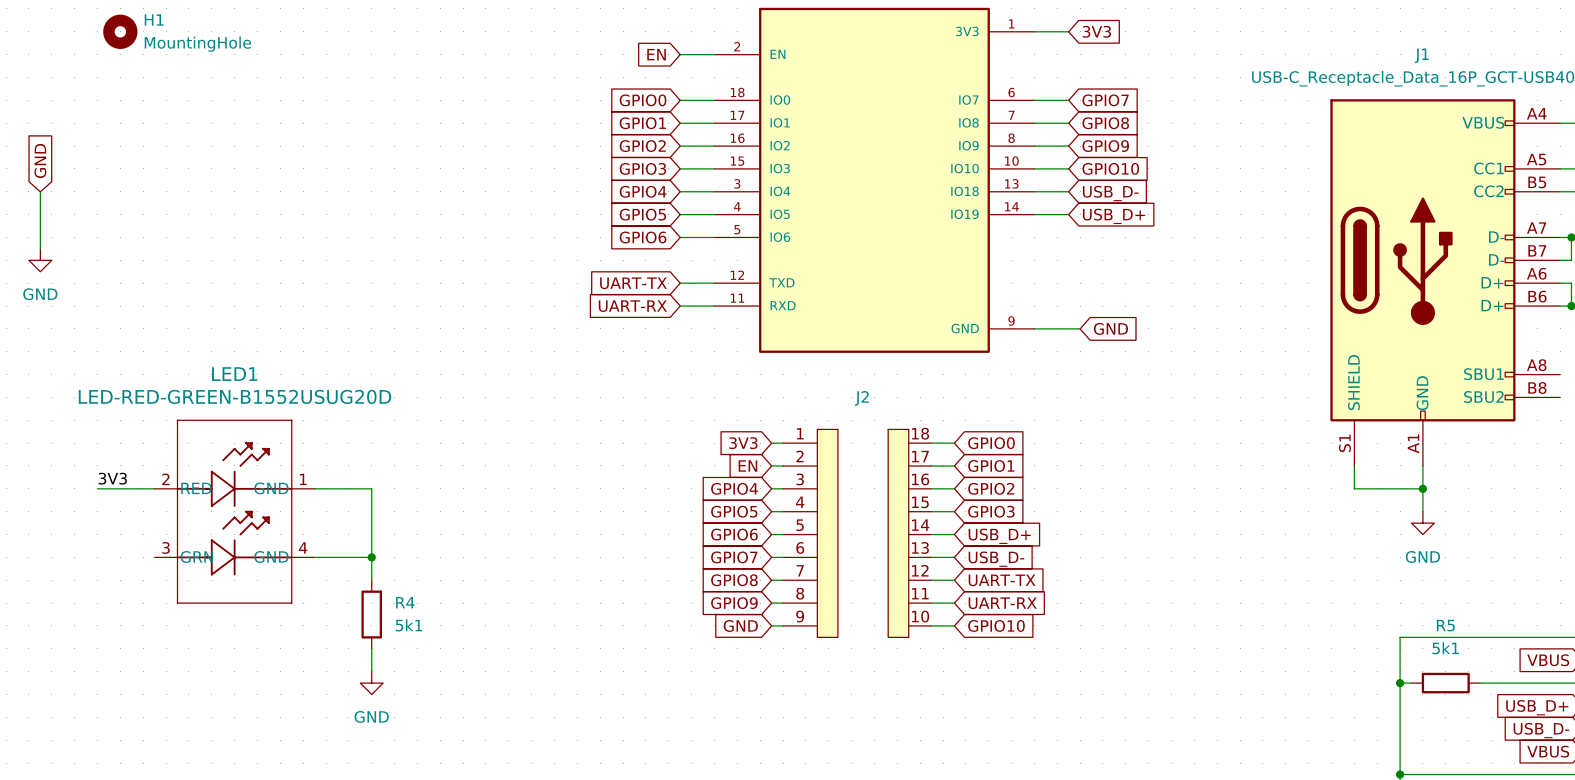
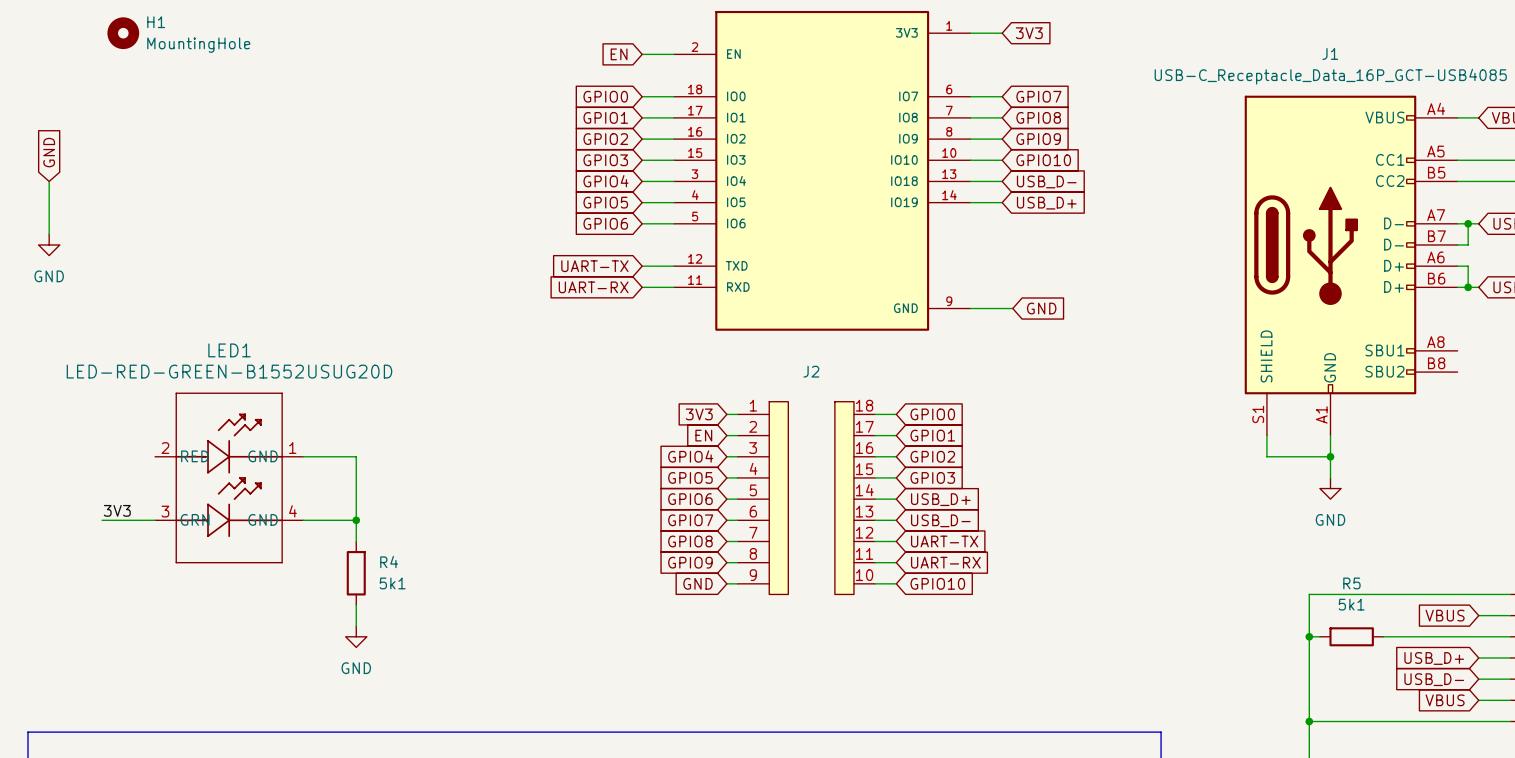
label position: 3V3 (112, 478) -> 3V3 (117, 510)
wire: (97, 488) (154, 488) -> (102, 520) (155, 520)

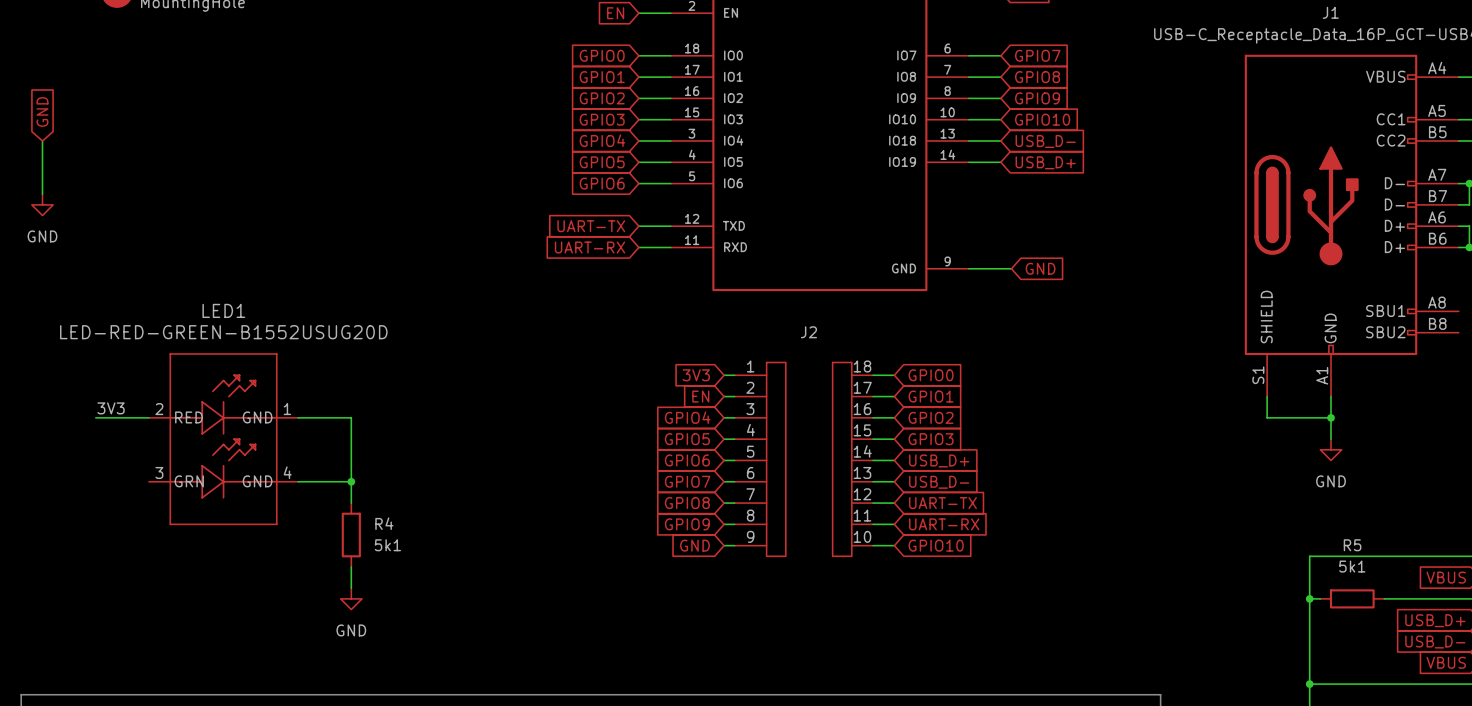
label position: 3V3 (117, 510) -> 3V3 (111, 408)
wire: (102, 520) (155, 520) -> (95, 417) (148, 417)

